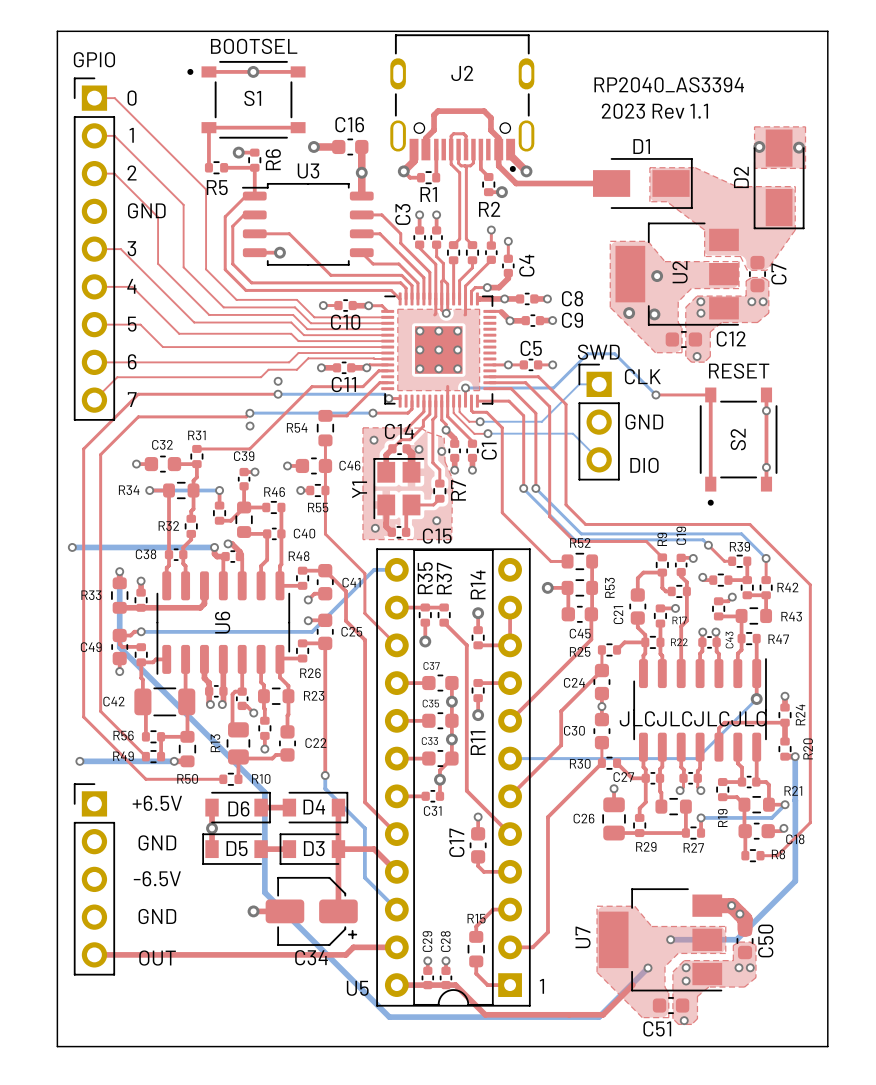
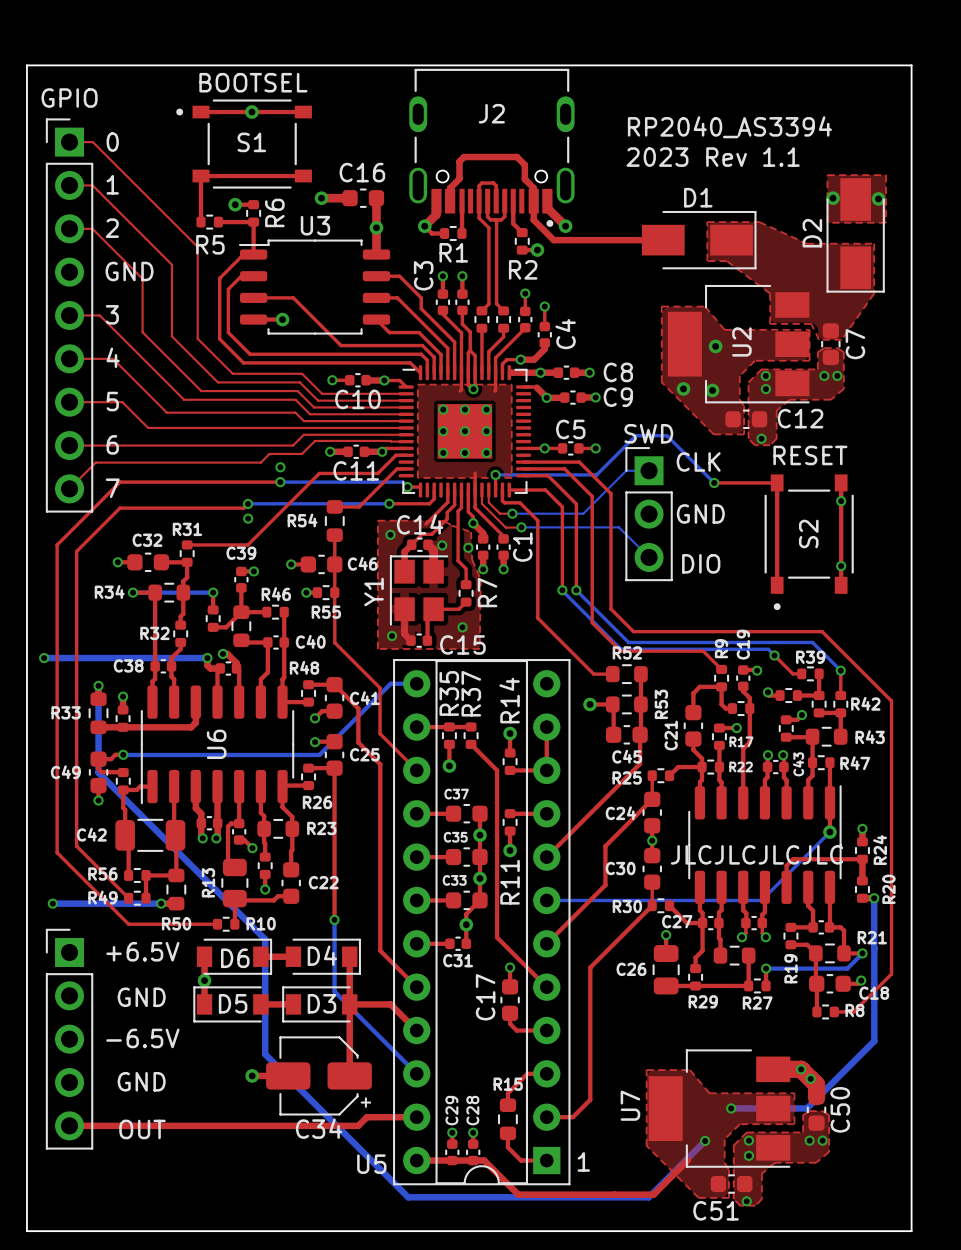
bottom track: (325, 788) (364, 828) (364, 877) -> (334, 935) (334, 991) (380, 1037)

